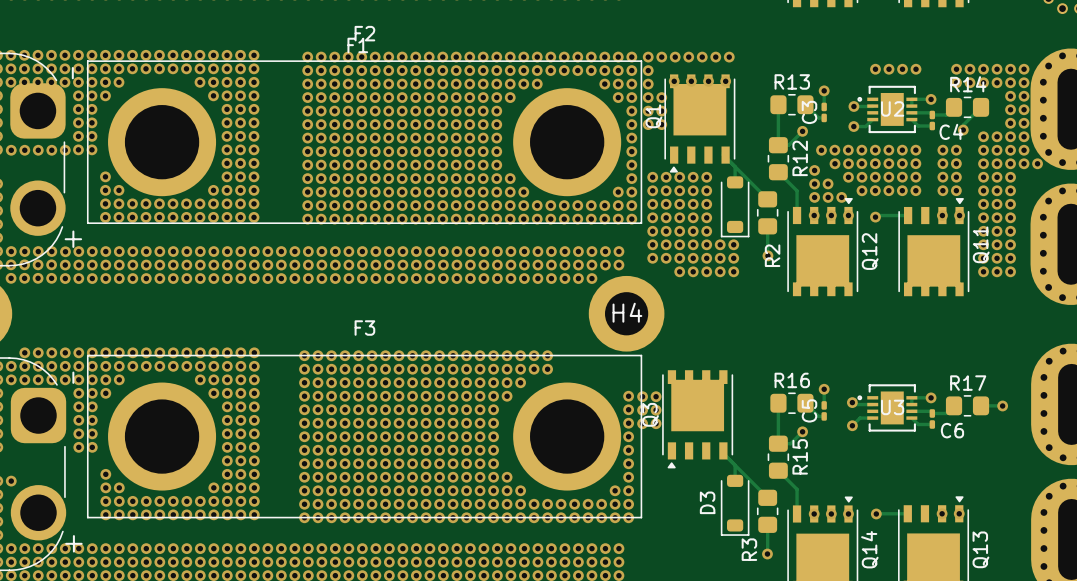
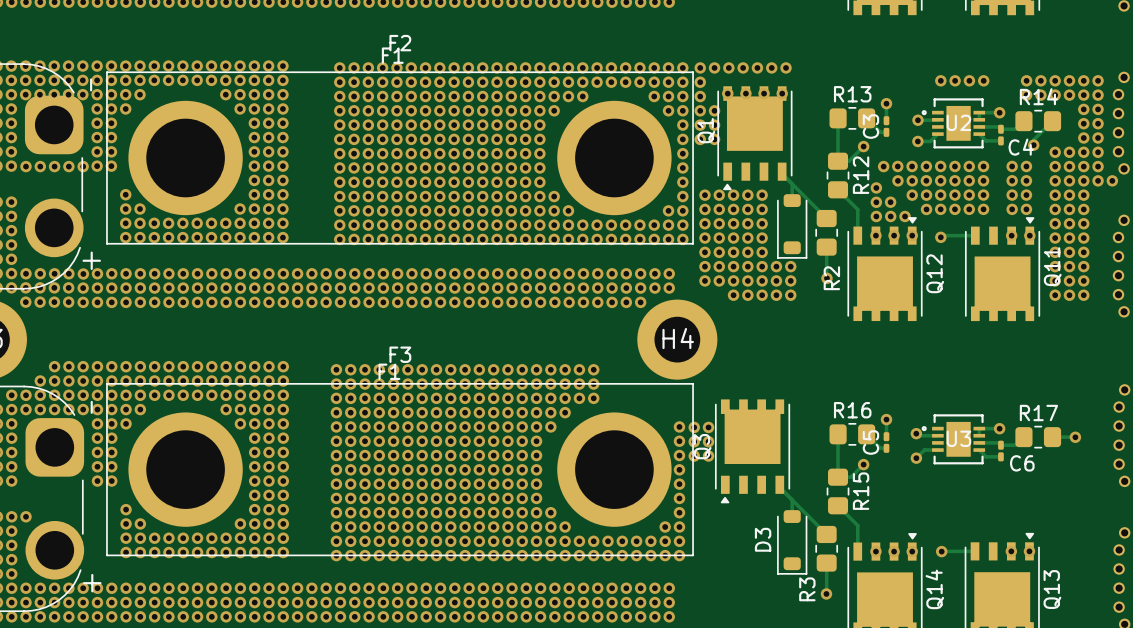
via: none -> (54, 366)
via: none -> (68, 366)
via: none -> (83, 366)
via: none -> (97, 366)
via: none -> (111, 366)
via: none -> (126, 366)
via: none -> (140, 366)
via: none -> (154, 366)
via: none -> (168, 366)
via: none -> (183, 366)
via: none -> (197, 366)
via: none -> (211, 366)
via: none -> (226, 366)
via: none -> (240, 366)
via: none -> (254, 366)
via: none -> (269, 366)
via: none -> (283, 366)
via: none -> (336, 369)
via: none -> (350, 369)
via: none -> (365, 369)
via: none -> (379, 369)
via: none -> (393, 369)
via: none -> (407, 369)
via: none -> (422, 369)
via: none -> (436, 369)
via: none -> (450, 369)
via: none -> (465, 369)
via: none -> (479, 369)
via: none -> (493, 369)
via: none -> (507, 369)
via: none -> (522, 369)
via: none -> (536, 369)
via: none -> (550, 369)
via: none -> (565, 369)
via: none -> (579, 369)
via: none -> (593, 369)
text: none -> F1 (389, 371)

